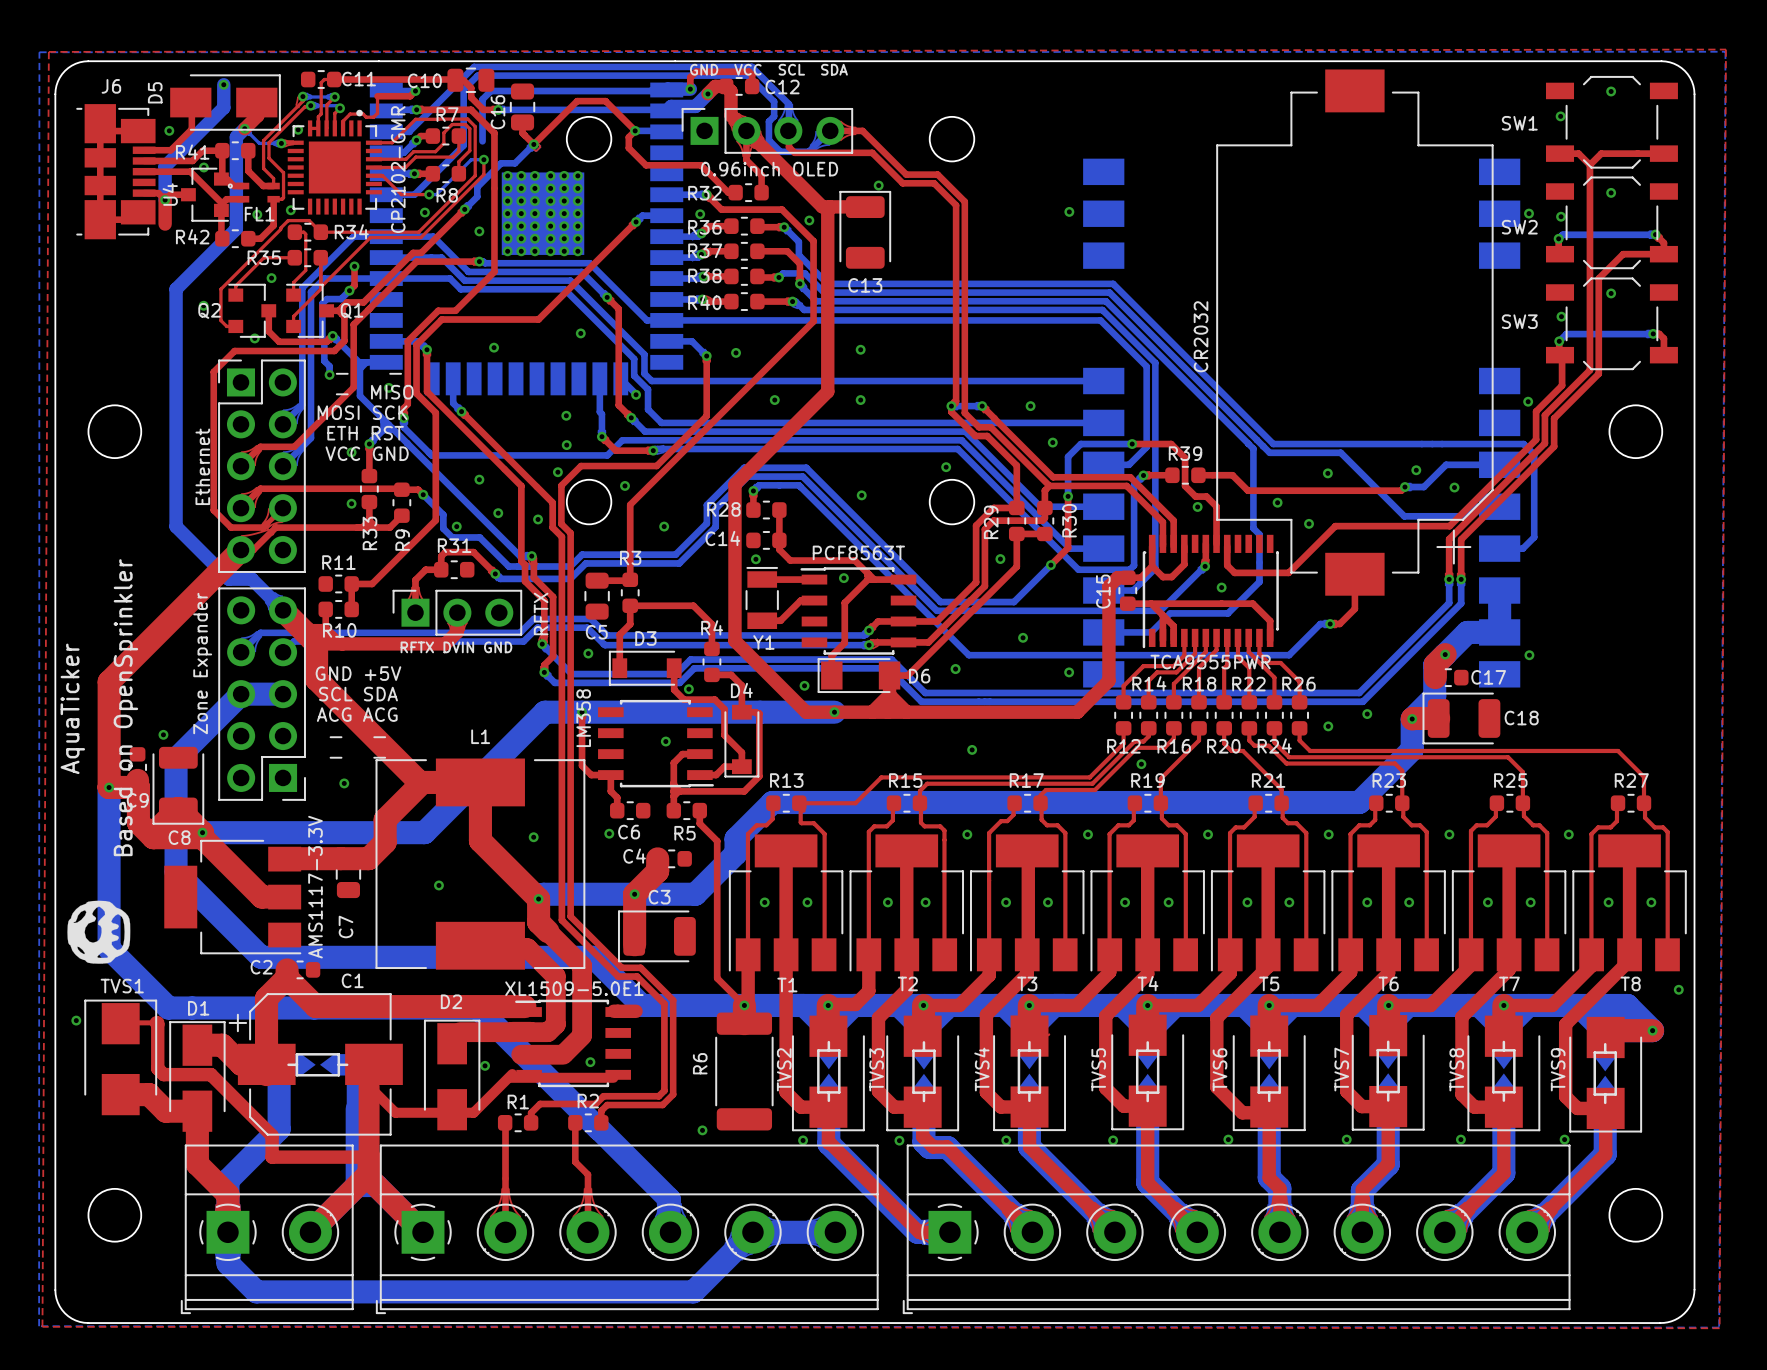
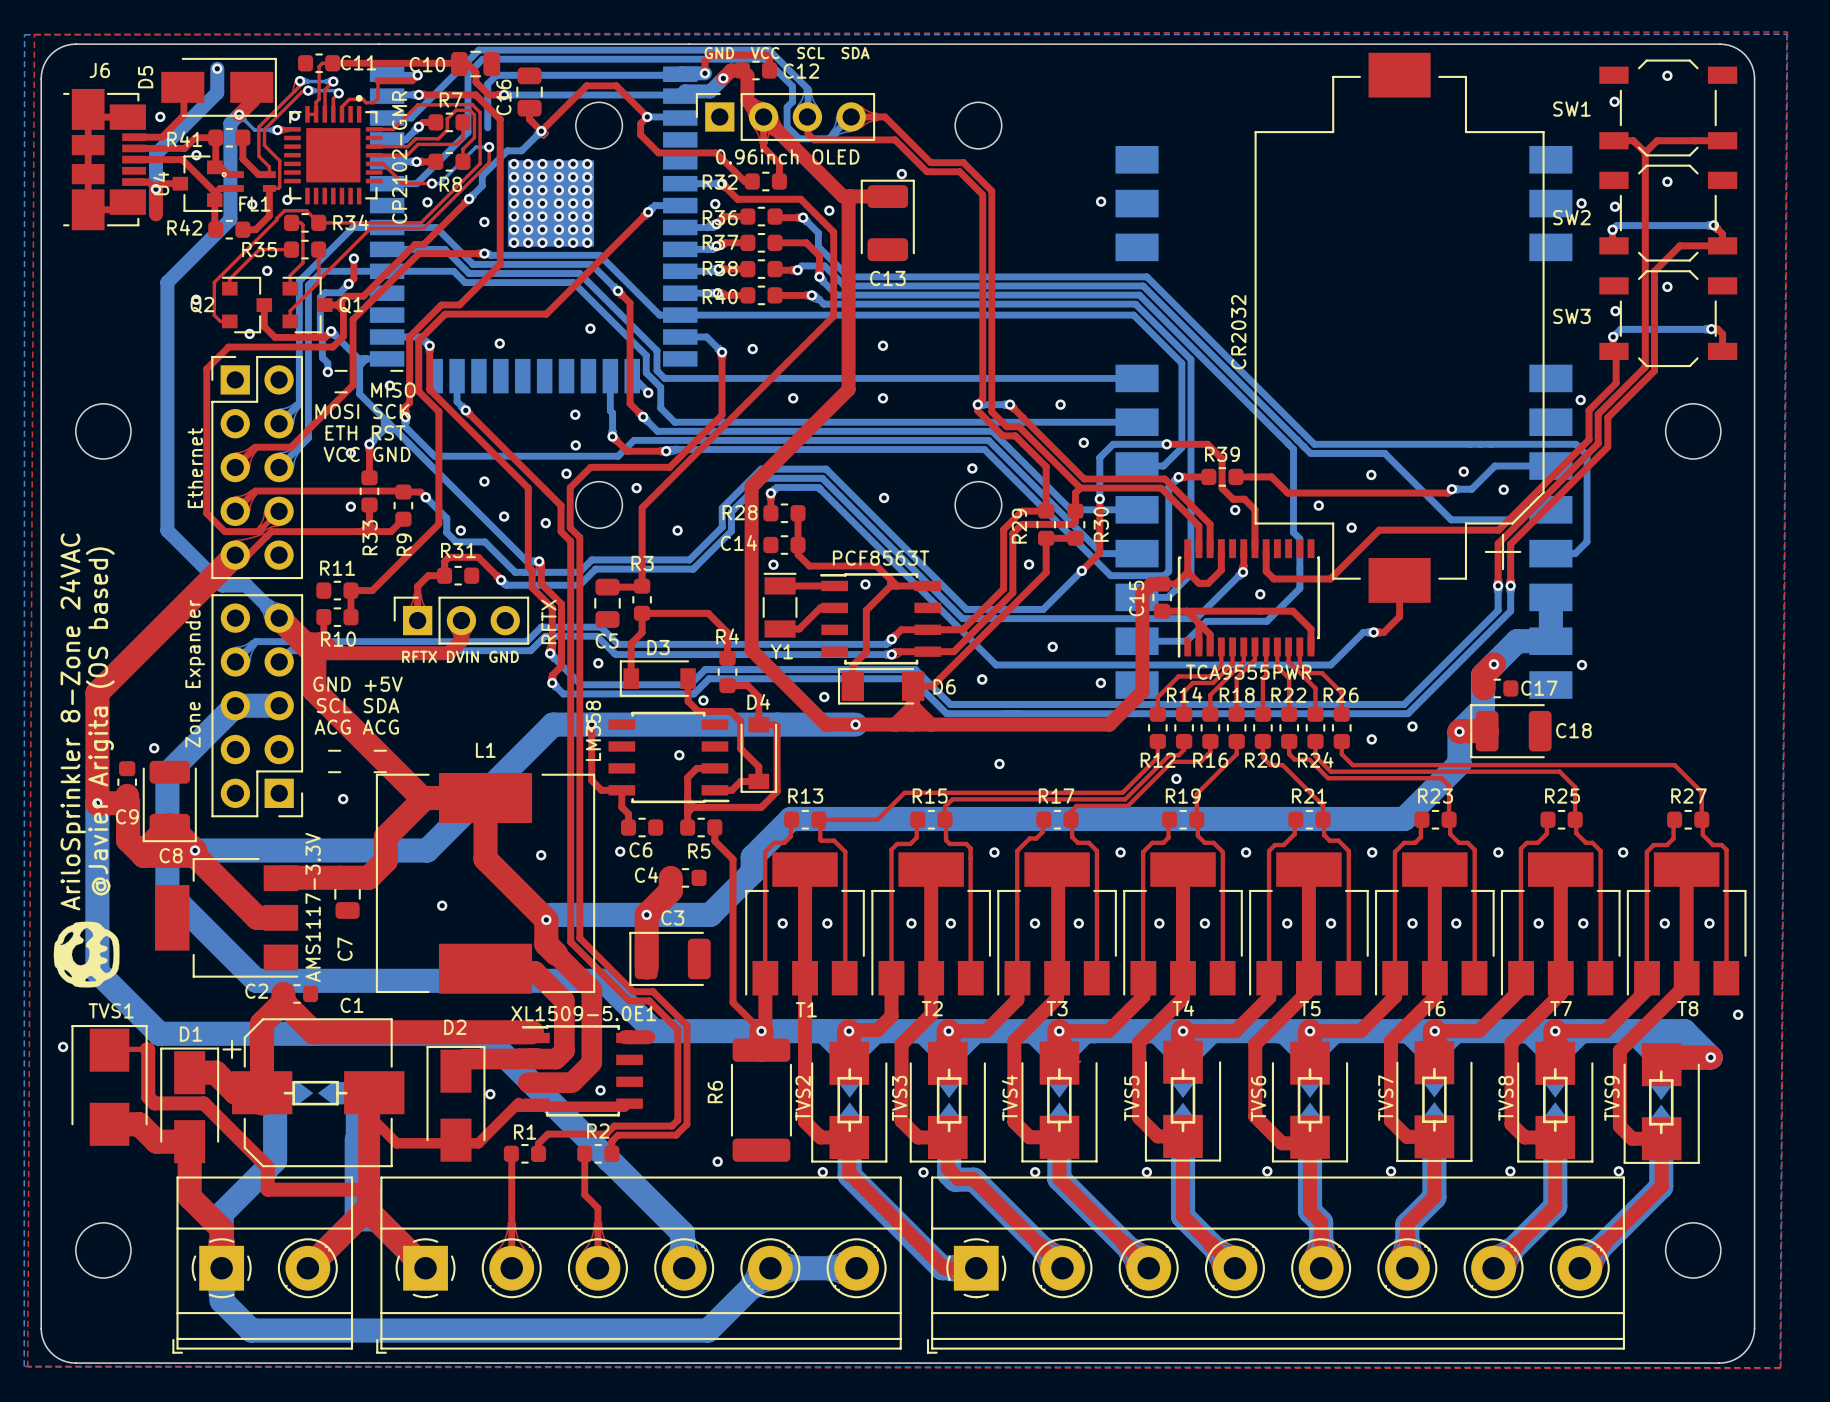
text: Based on OpenSprinkler (125, 707) -> @Javier Arigita (OS based) (100, 721)
text: AquaTicker (72, 708) -> AriloSprinkler 8-Zone 24VAC (72, 721)

